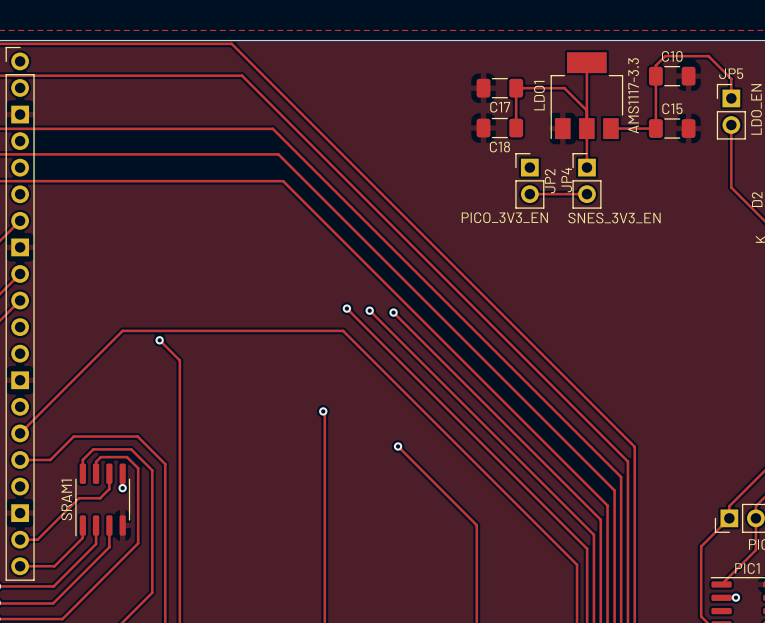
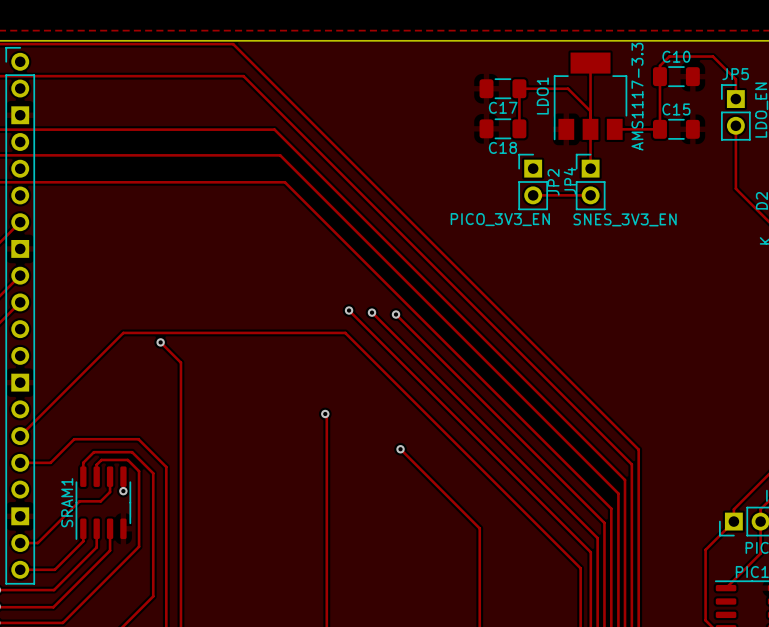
via: (735, 597) -> none

